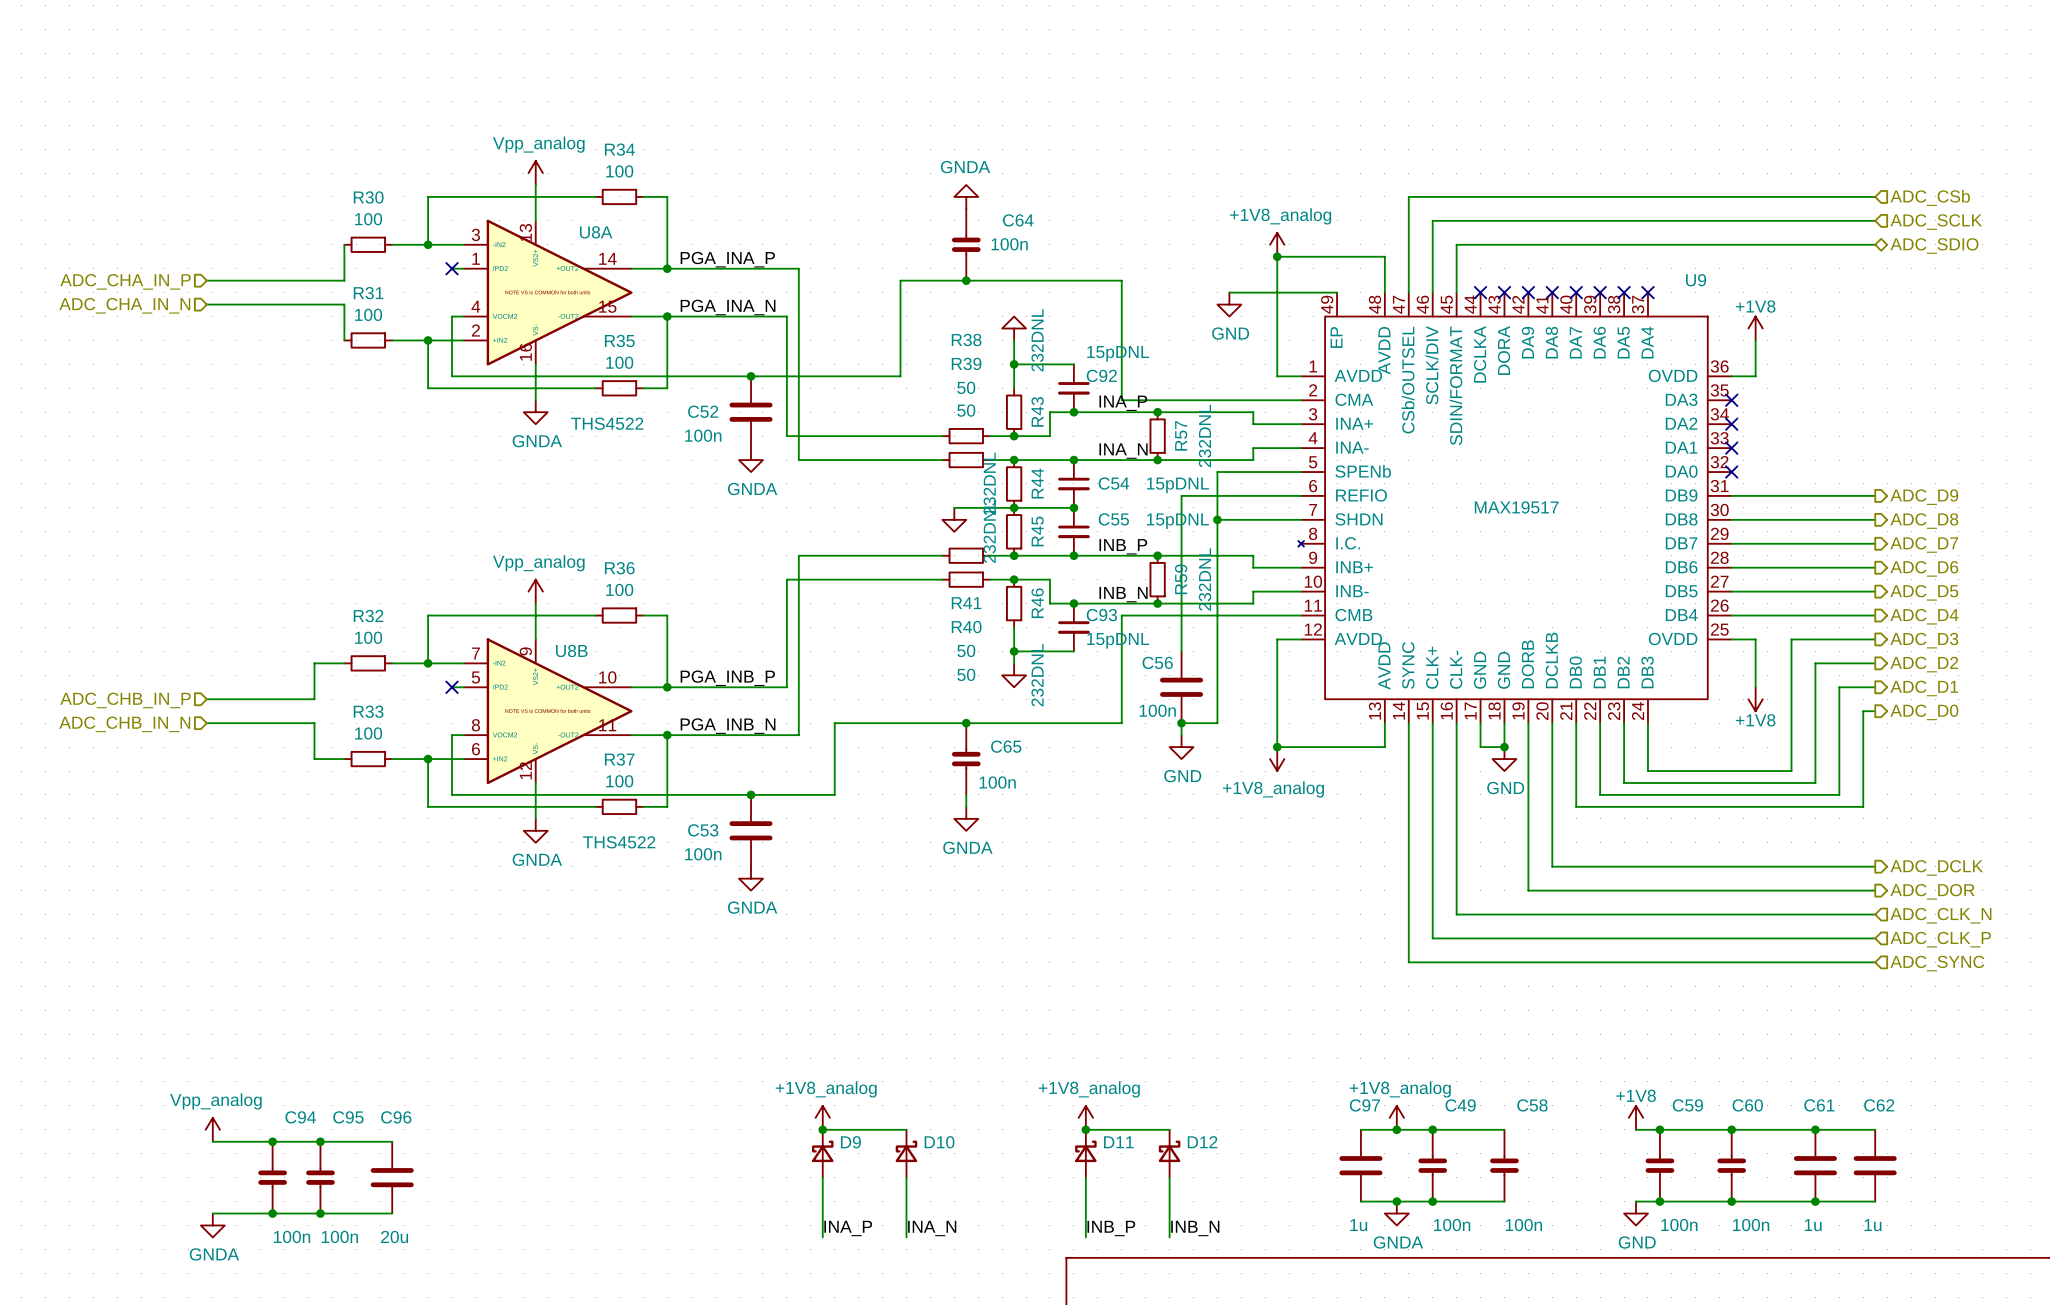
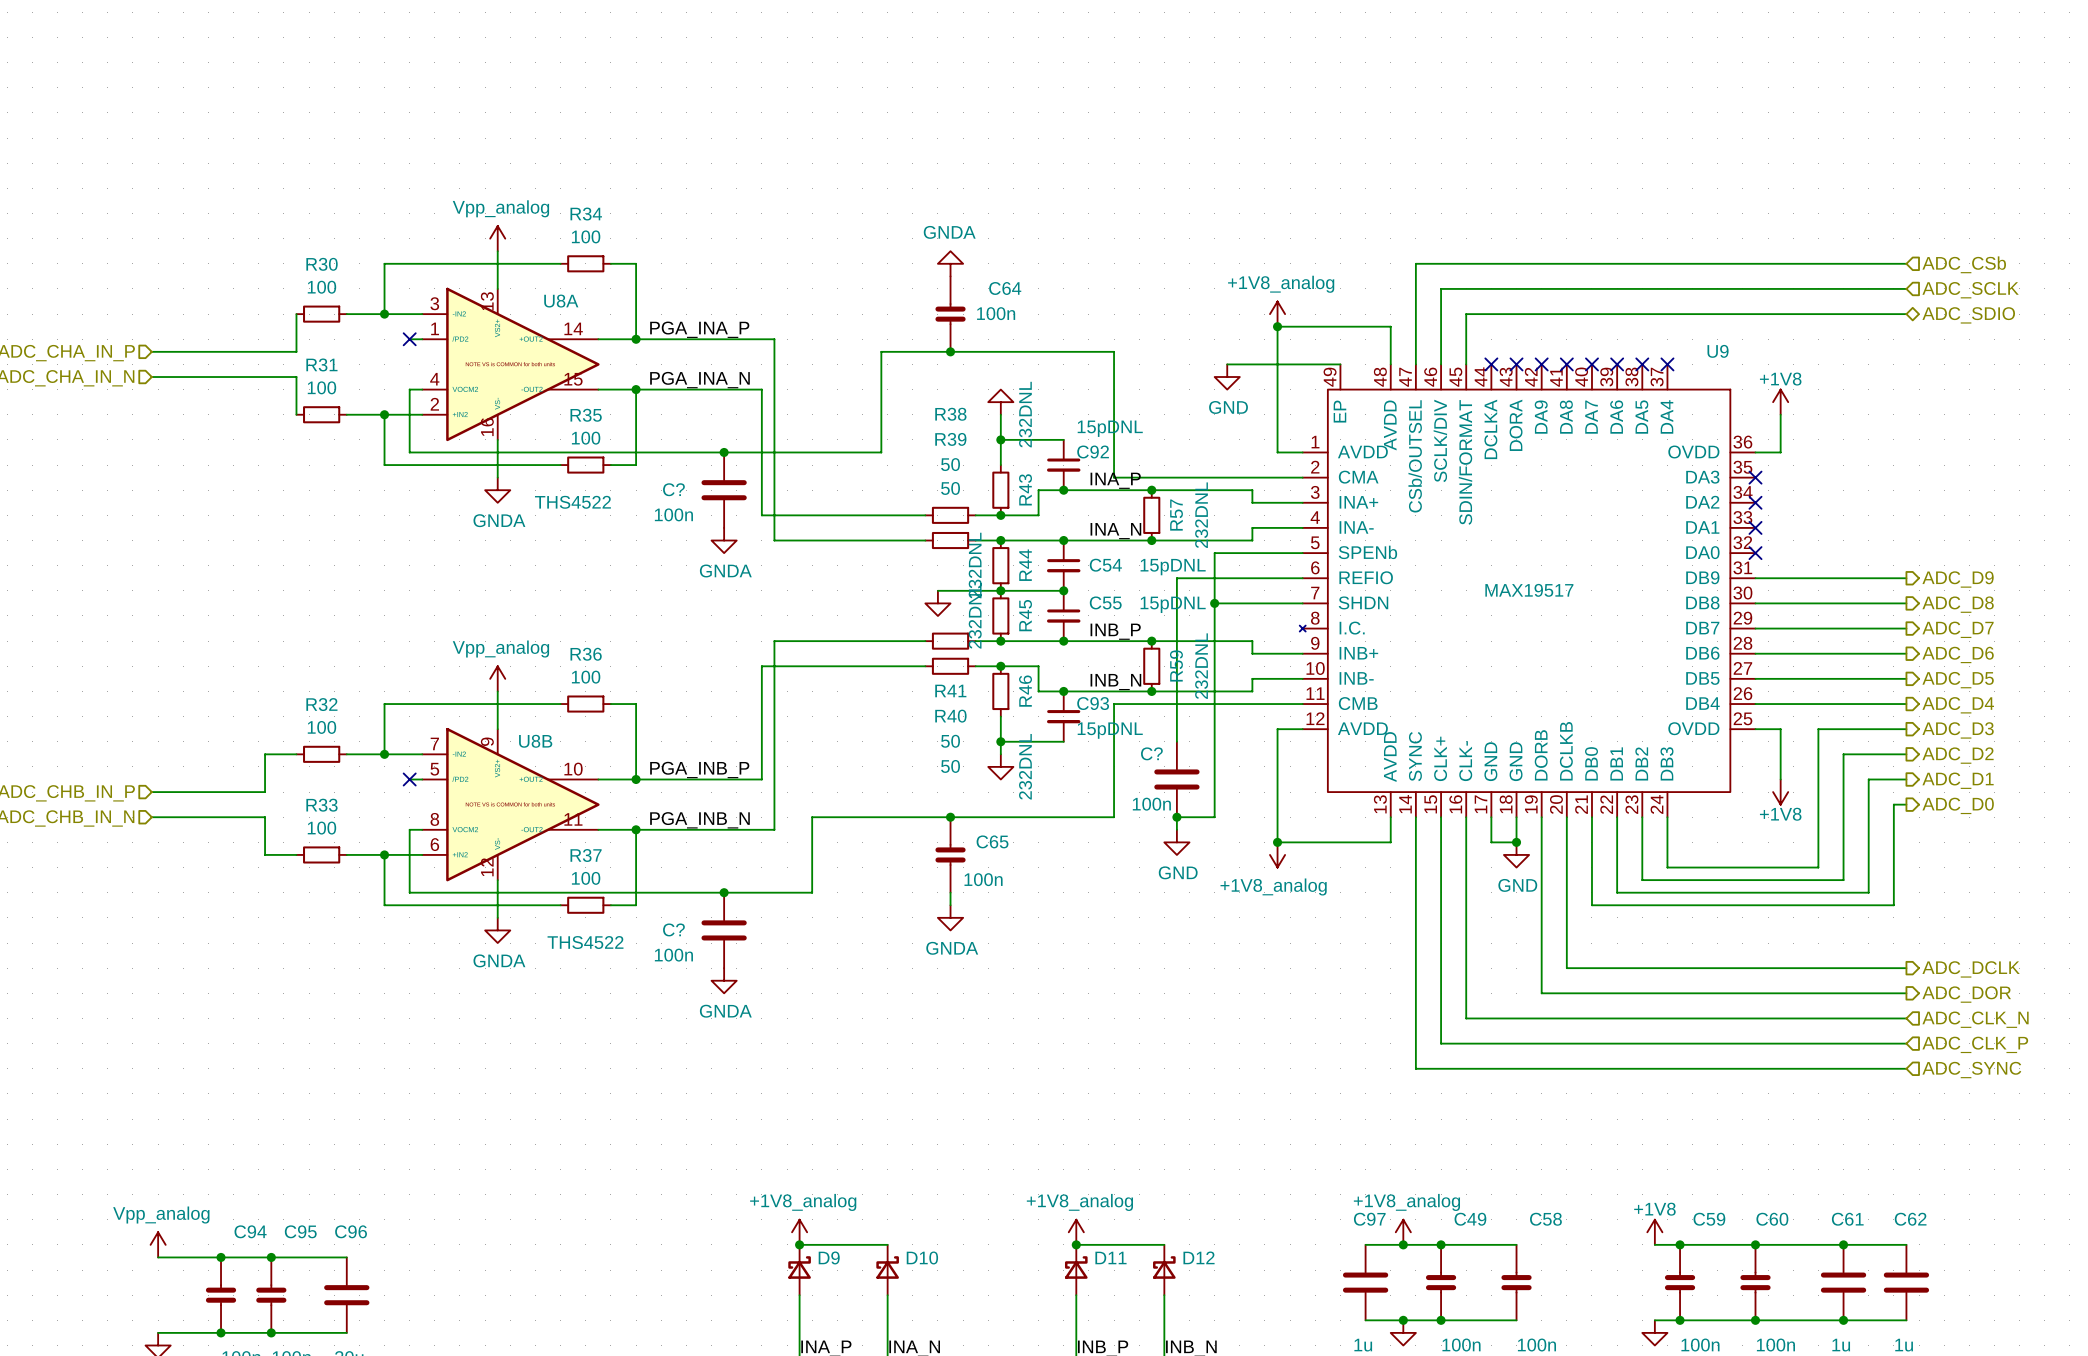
C52 name: C52 (703, 411) -> C? (673, 489)
C56 name: C56 (1157, 662) -> C? (1151, 753)
C53 name: C53 (703, 830) -> C? (673, 929)

